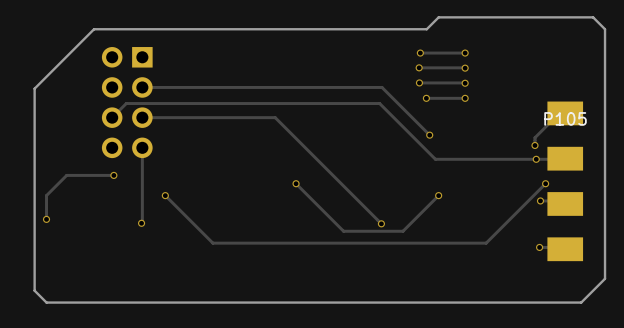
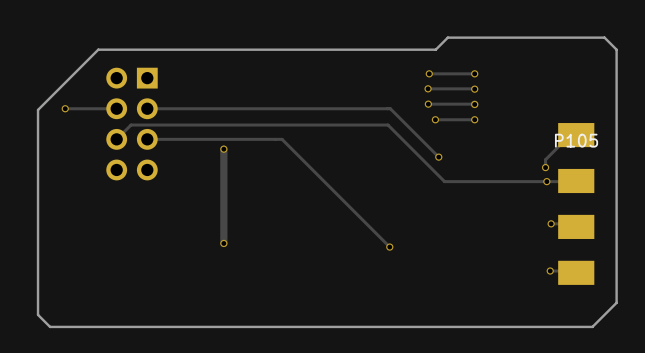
via: none -> (65, 108)
track: none -> (116, 108) (65, 108)
track: none -> (223, 149) (223, 243)
via: none -> (223, 149)
track: (142, 147) (141, 223) -> none
track: (113, 175) (66, 175) (46, 195) (46, 219) -> none
via: (113, 175) -> none
track: (296, 183) (343, 231) (403, 231) (438, 195) -> none
via: (296, 183) -> none
track: (545, 183) (486, 243) (212, 243) (165, 195) -> none
via: (545, 183) -> none
via: (165, 195) -> none
via: (438, 195) -> none
via: (46, 219) -> none
via: none -> (223, 243)
via: (141, 223) -> none

